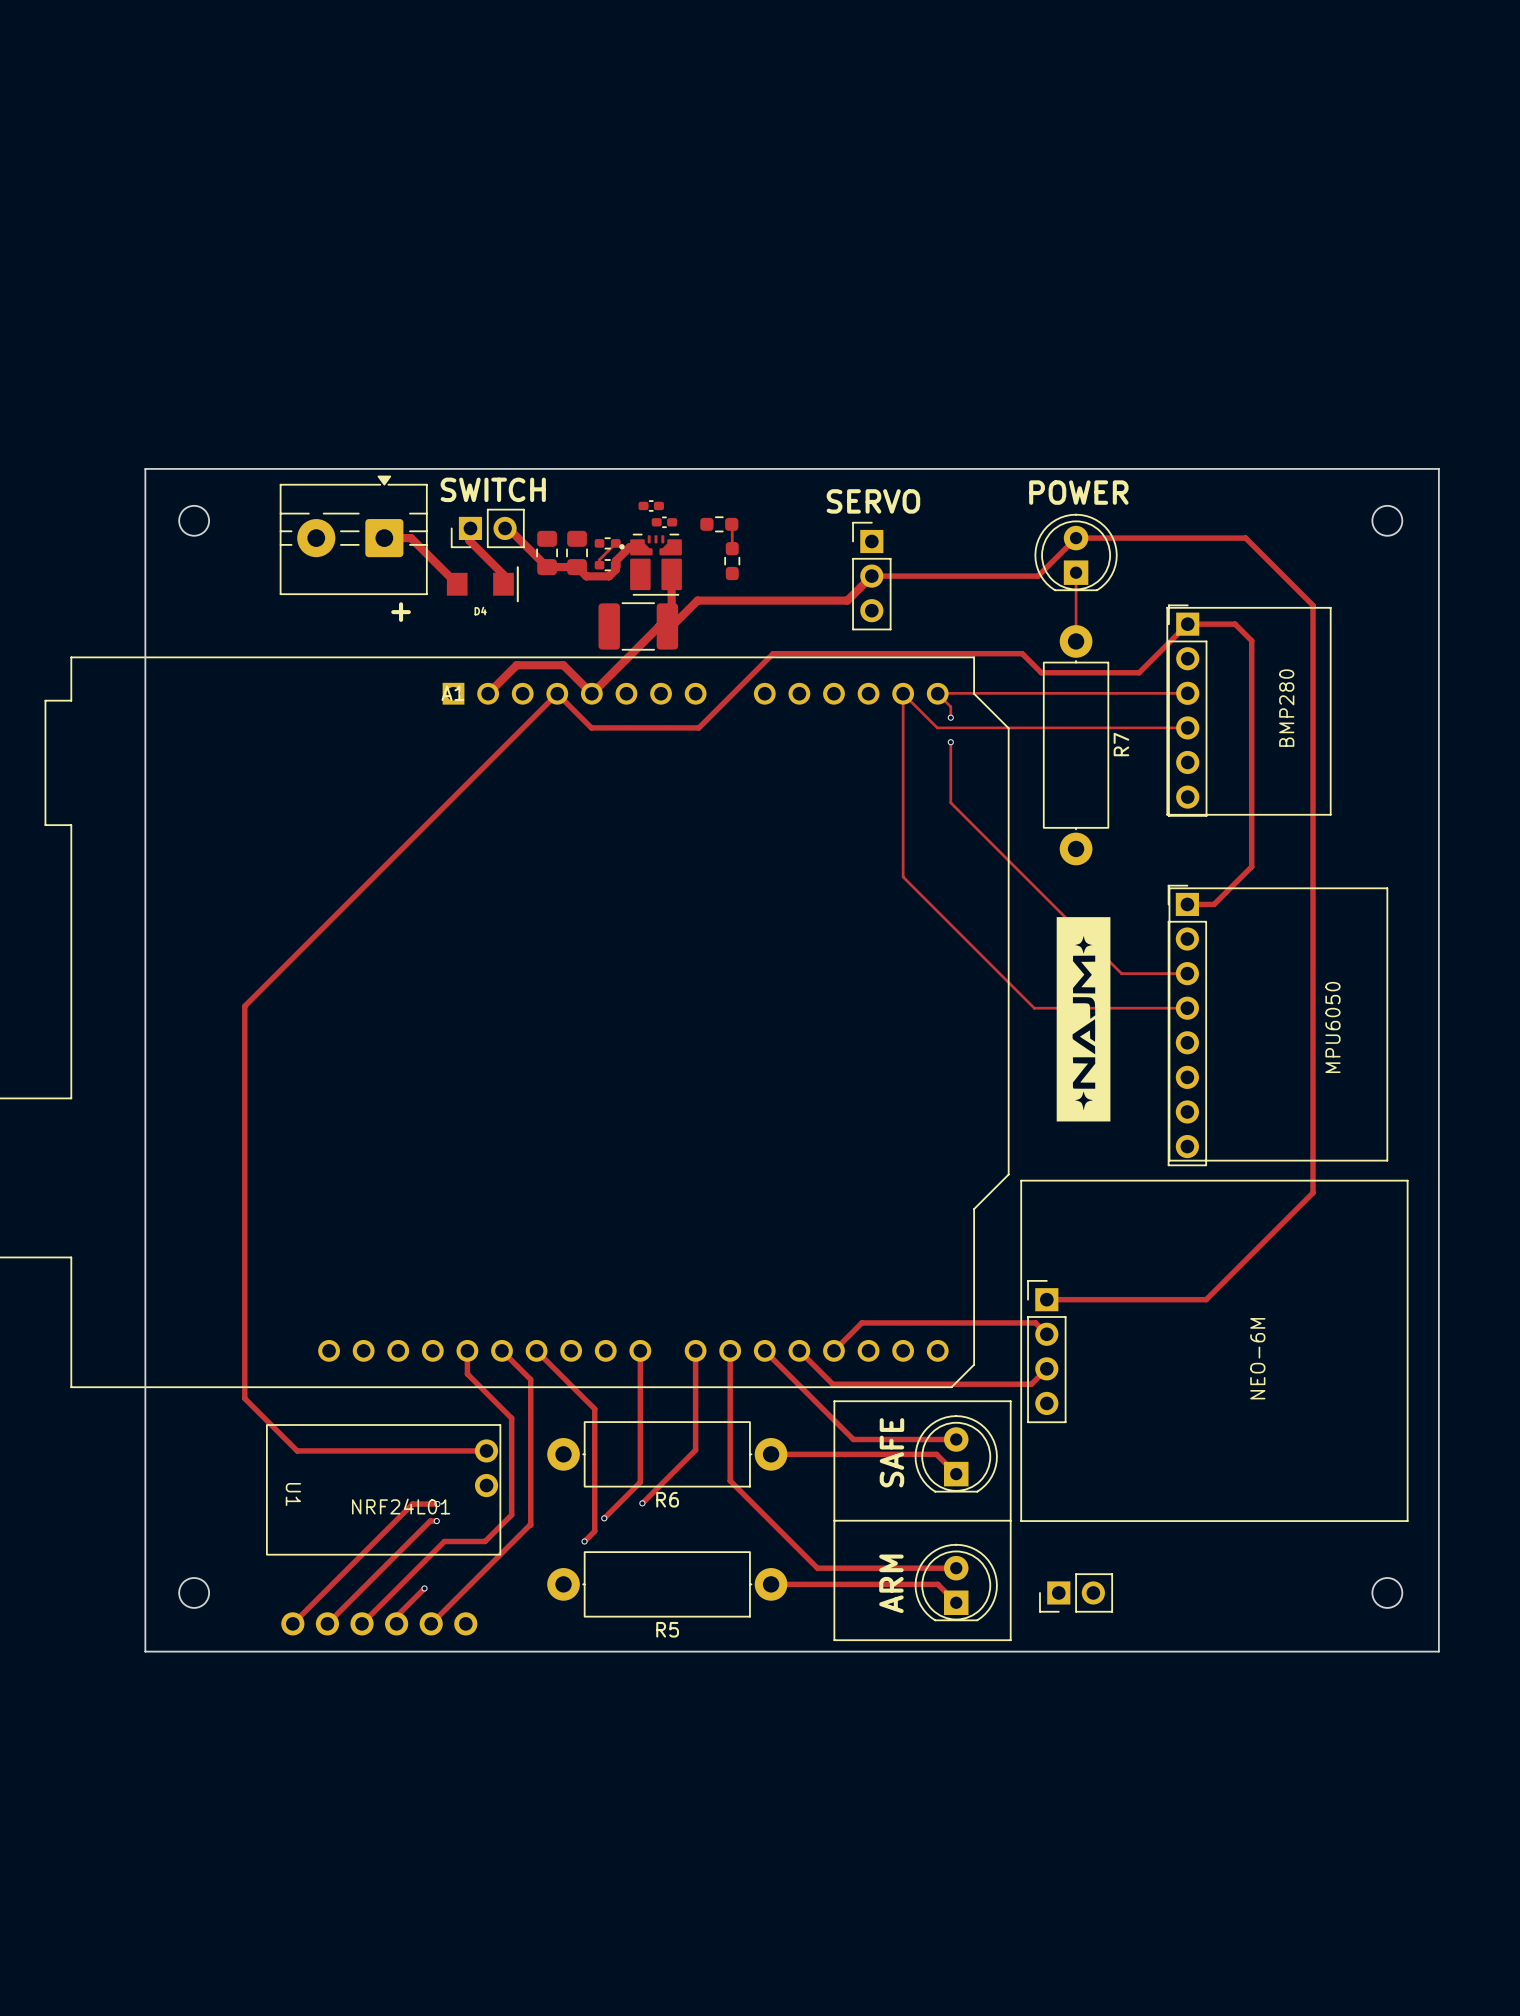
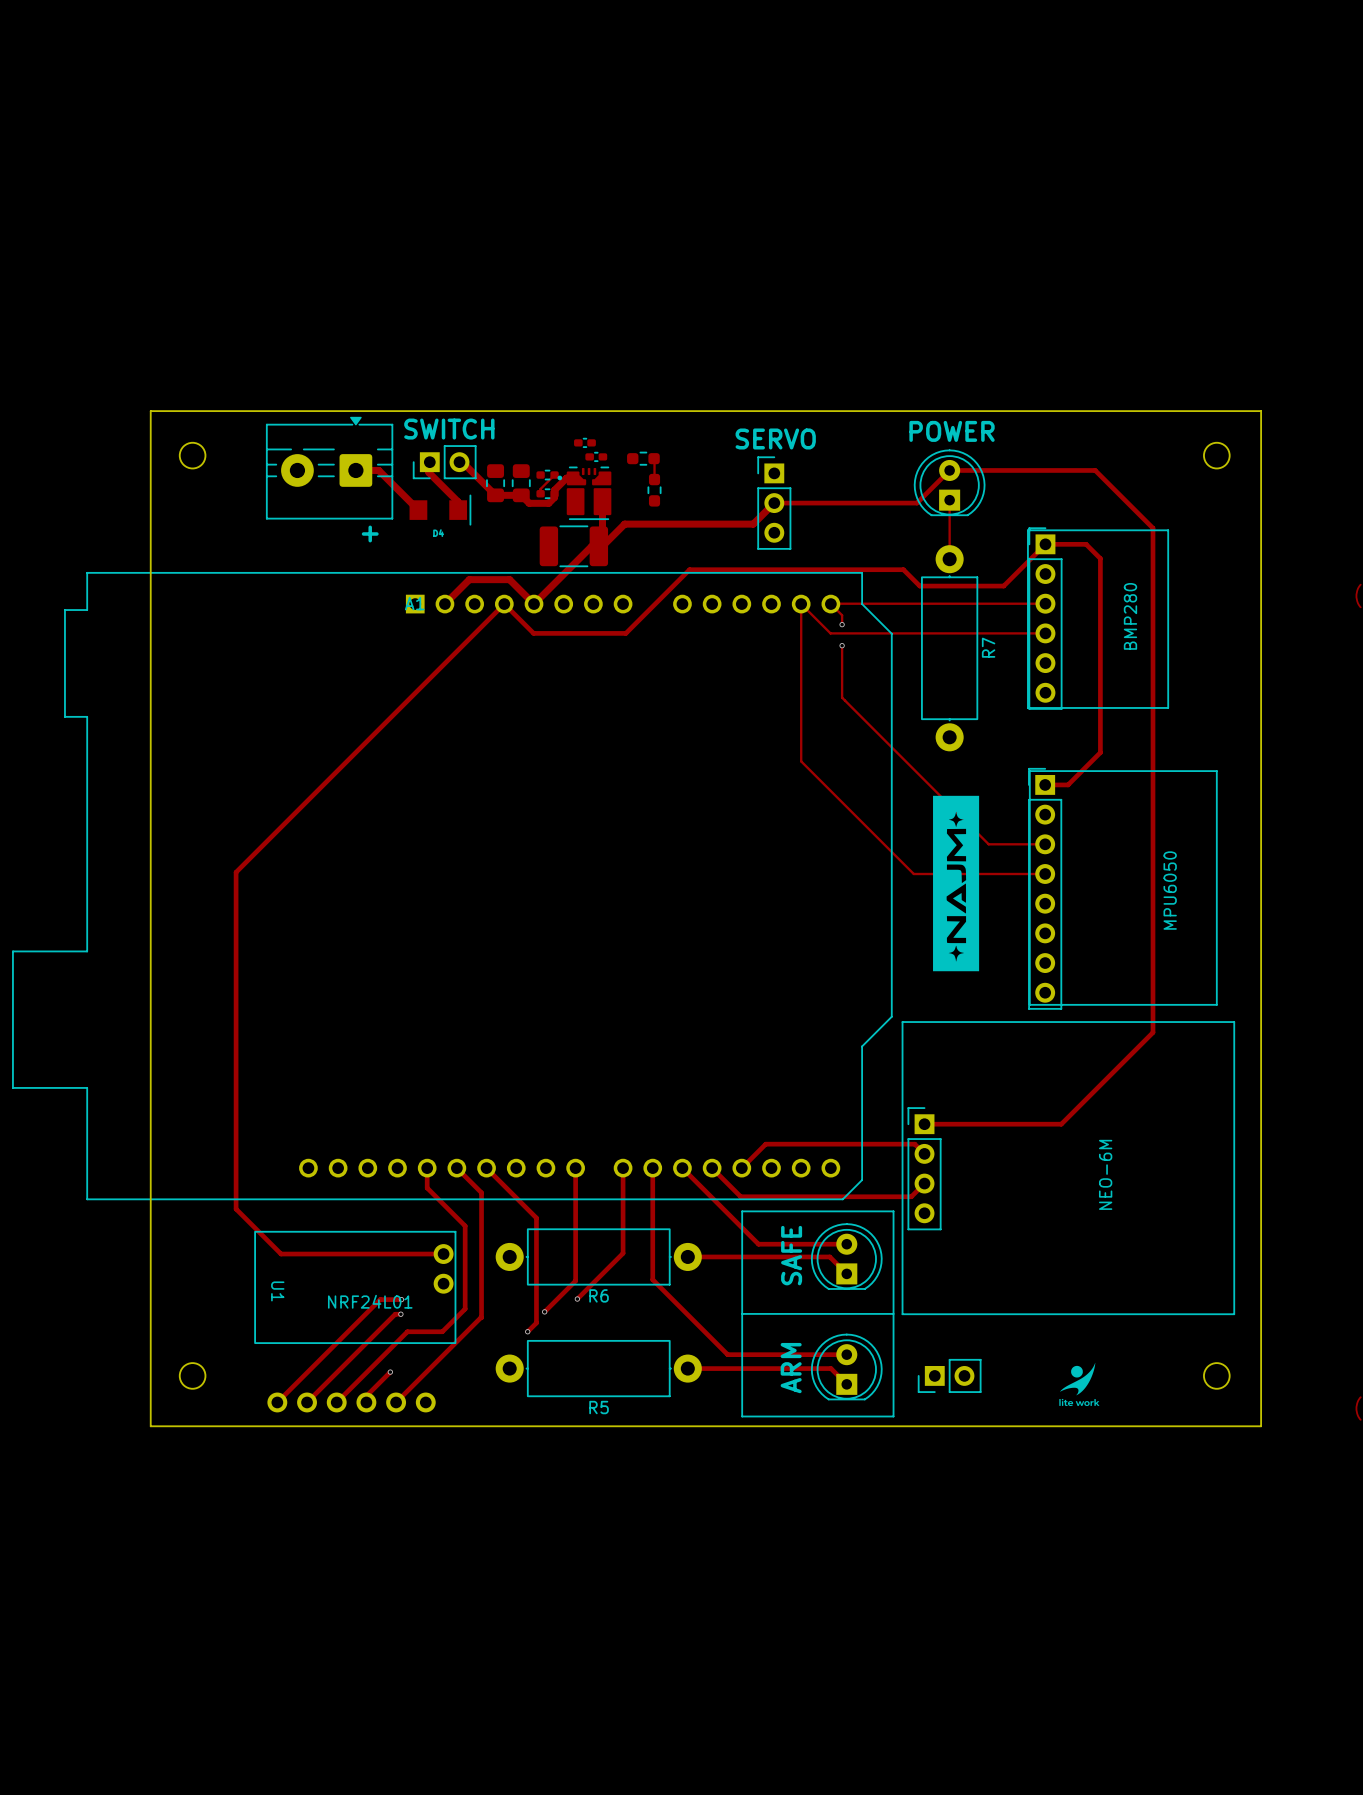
drawing: none -> [1059, 1362, 1100, 1407]

